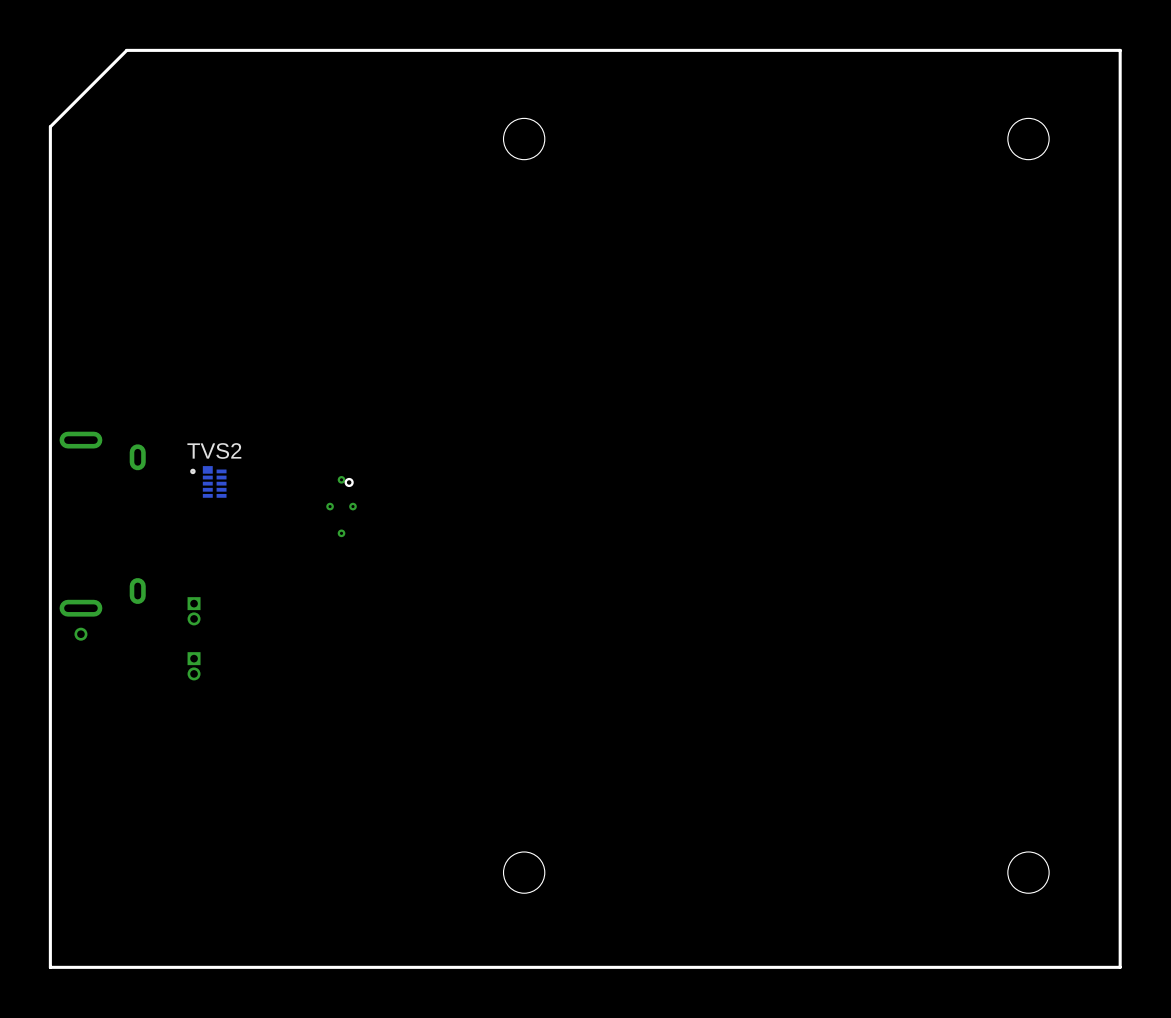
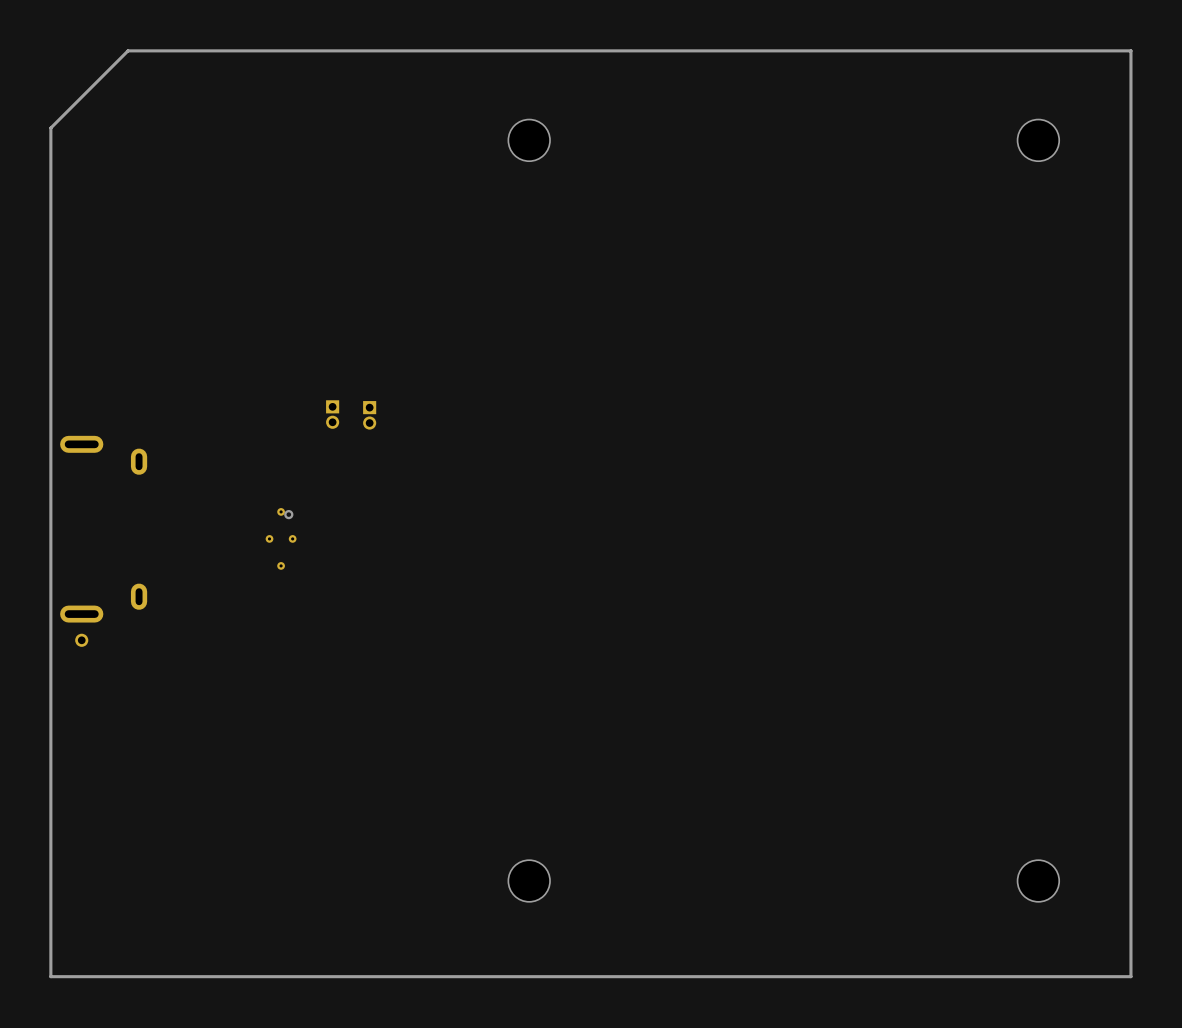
part: none -> (332, 414)
part: none -> (369, 415)
TVS2: (208, 481) -> none
part position: (341, 506) -> (281, 538)
part: (194, 611) -> none
part: (194, 666) -> none

